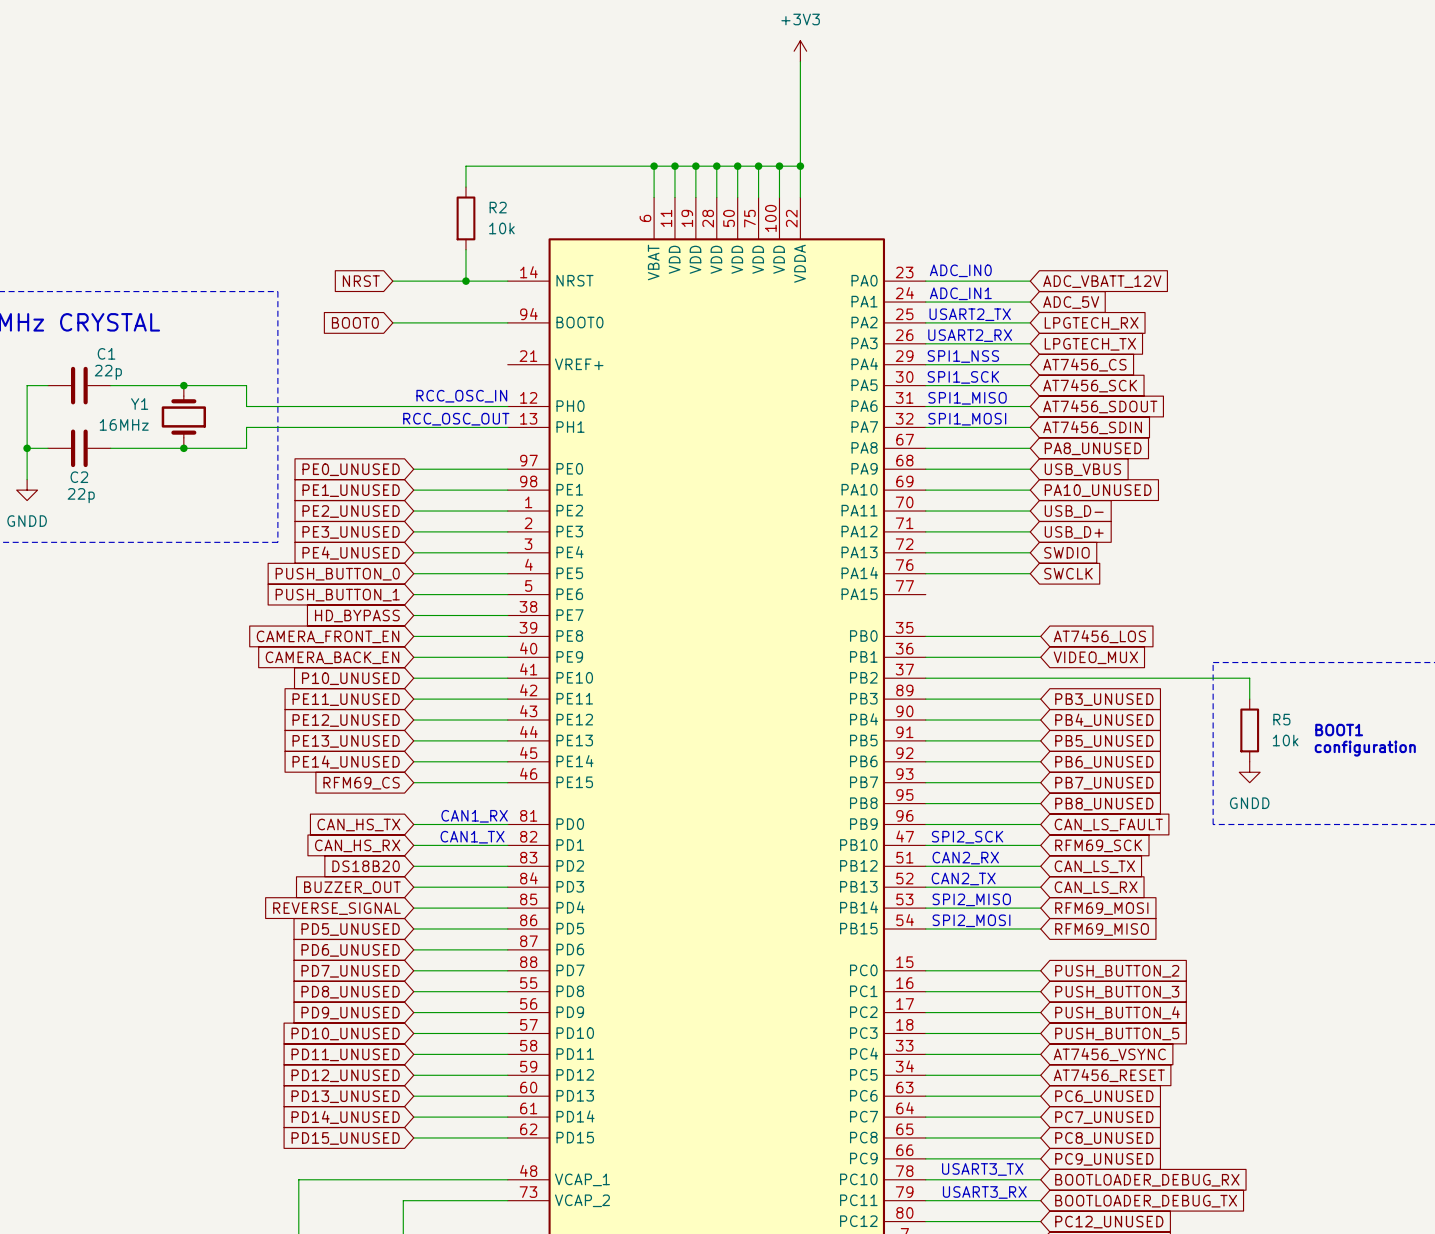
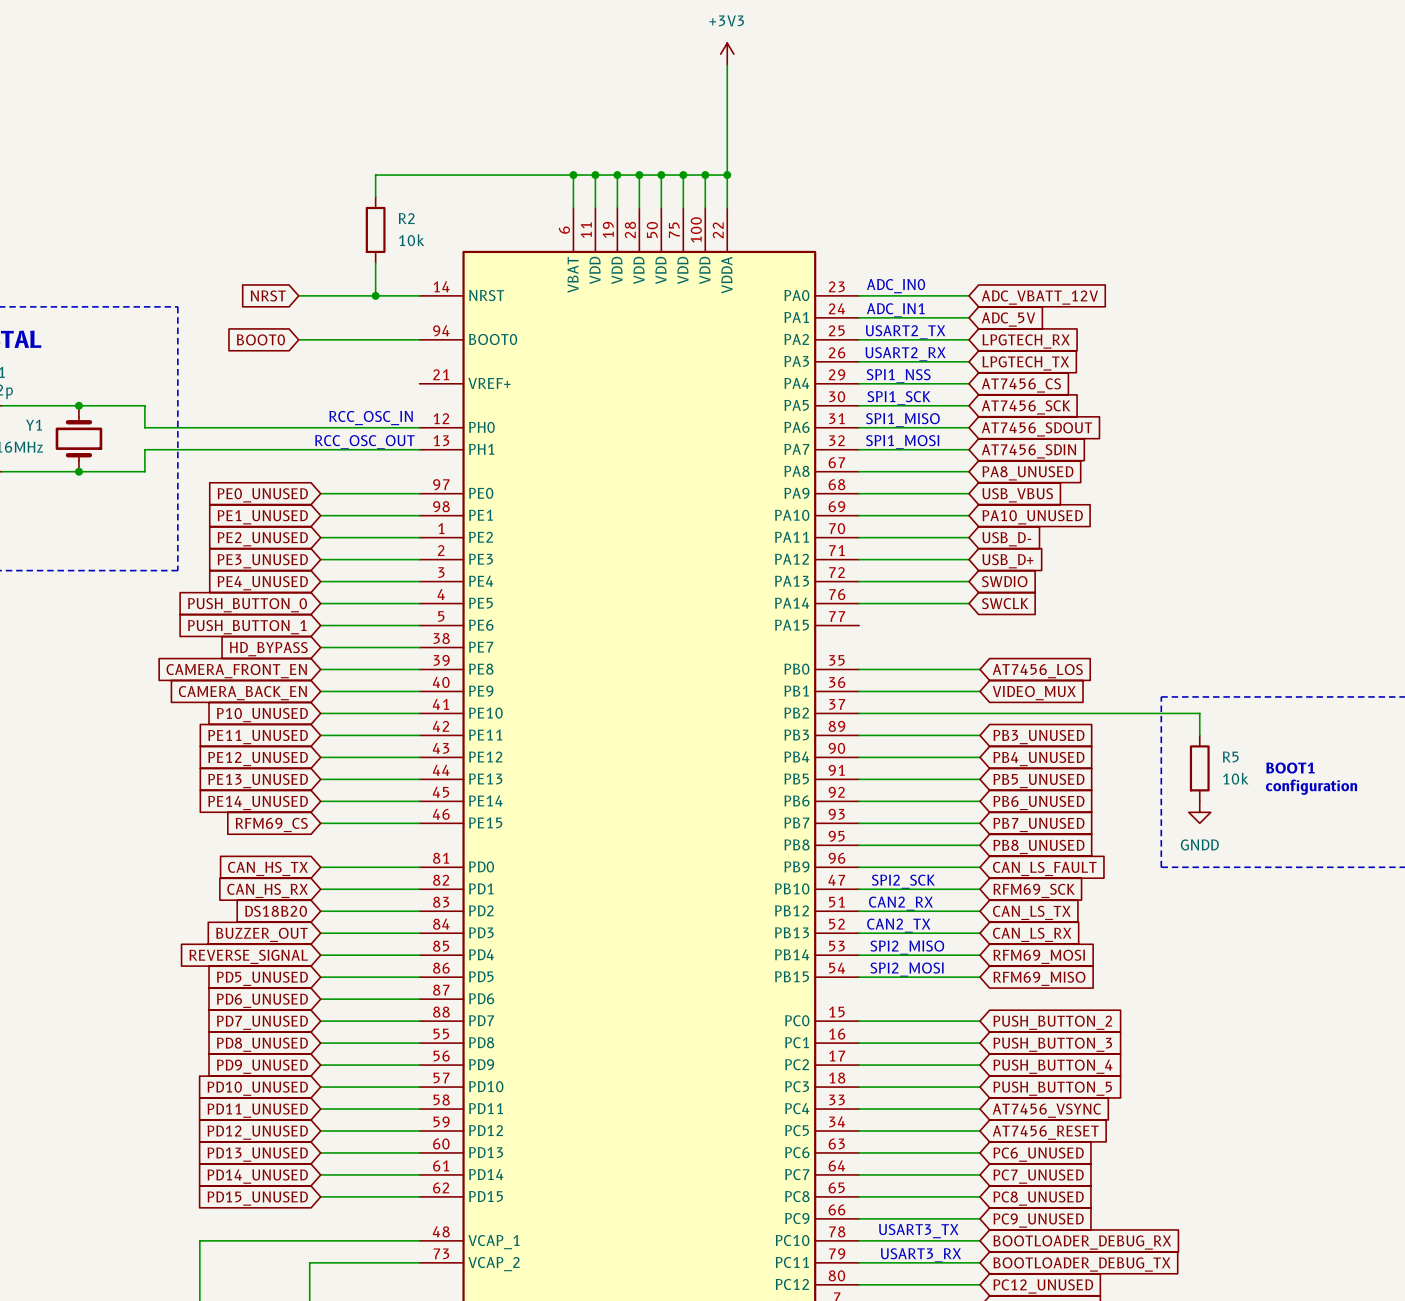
text: CAN1_RX (474, 816) -> none
text: CAN1_TX (472, 837) -> none

